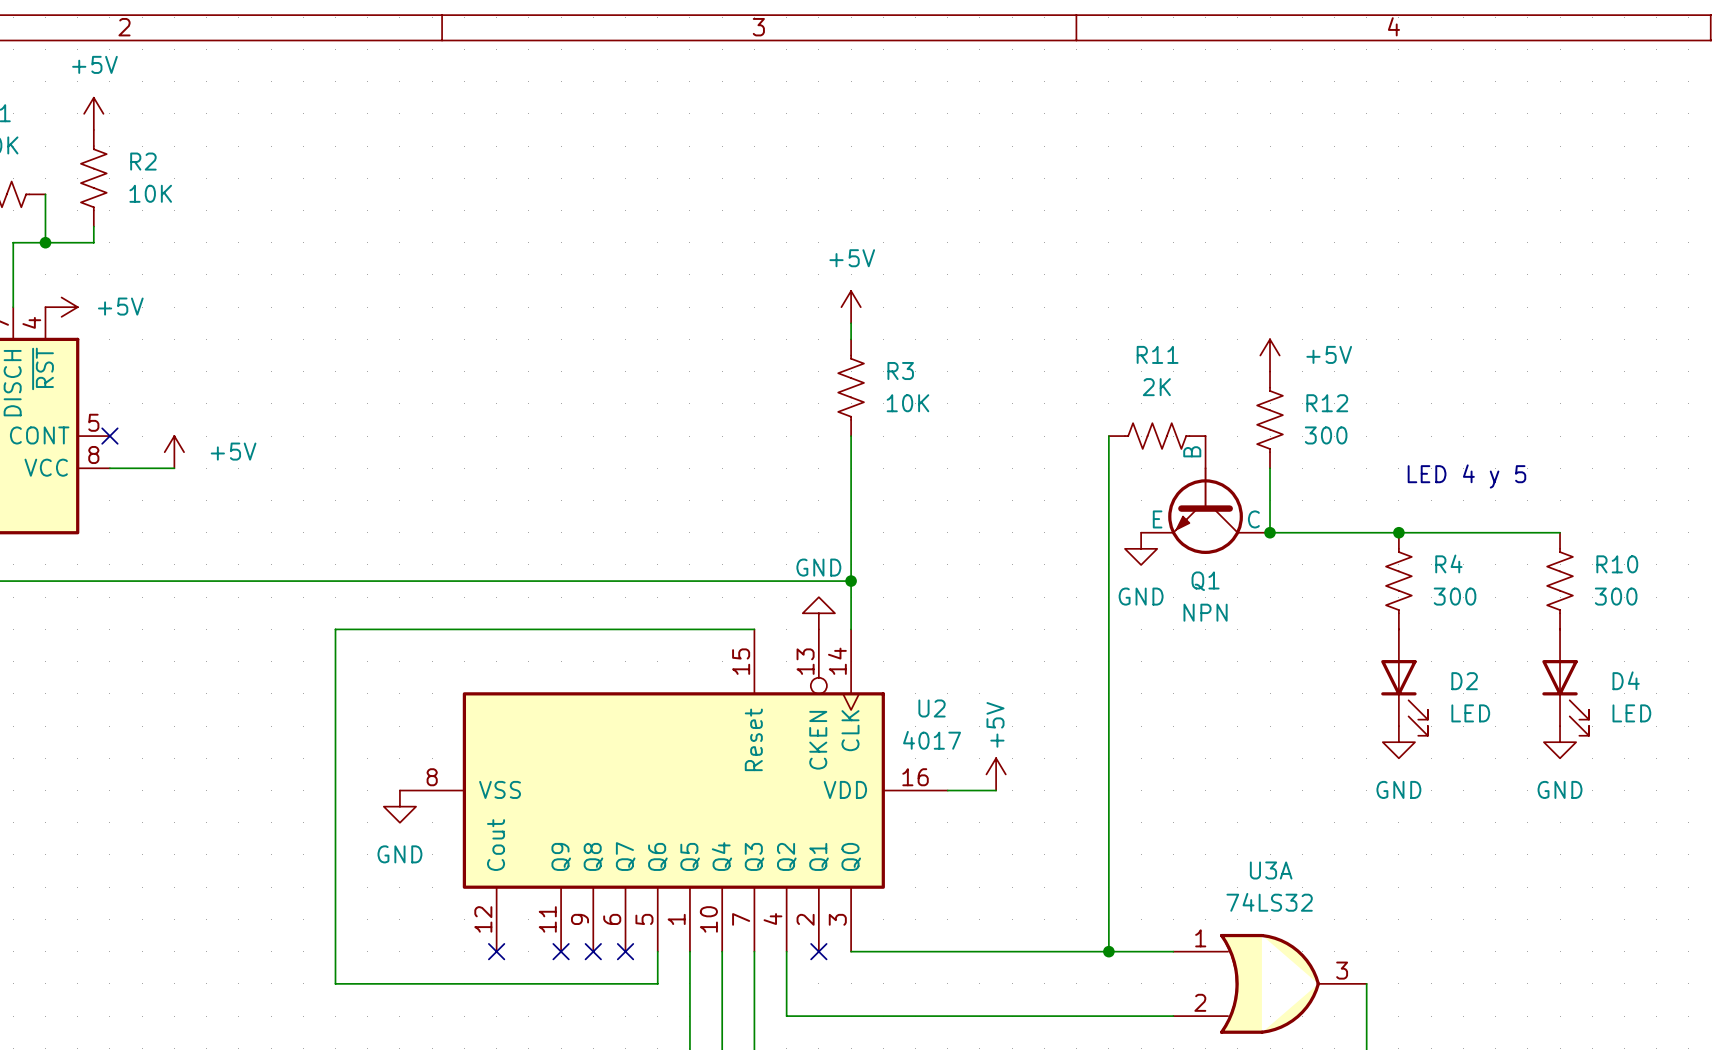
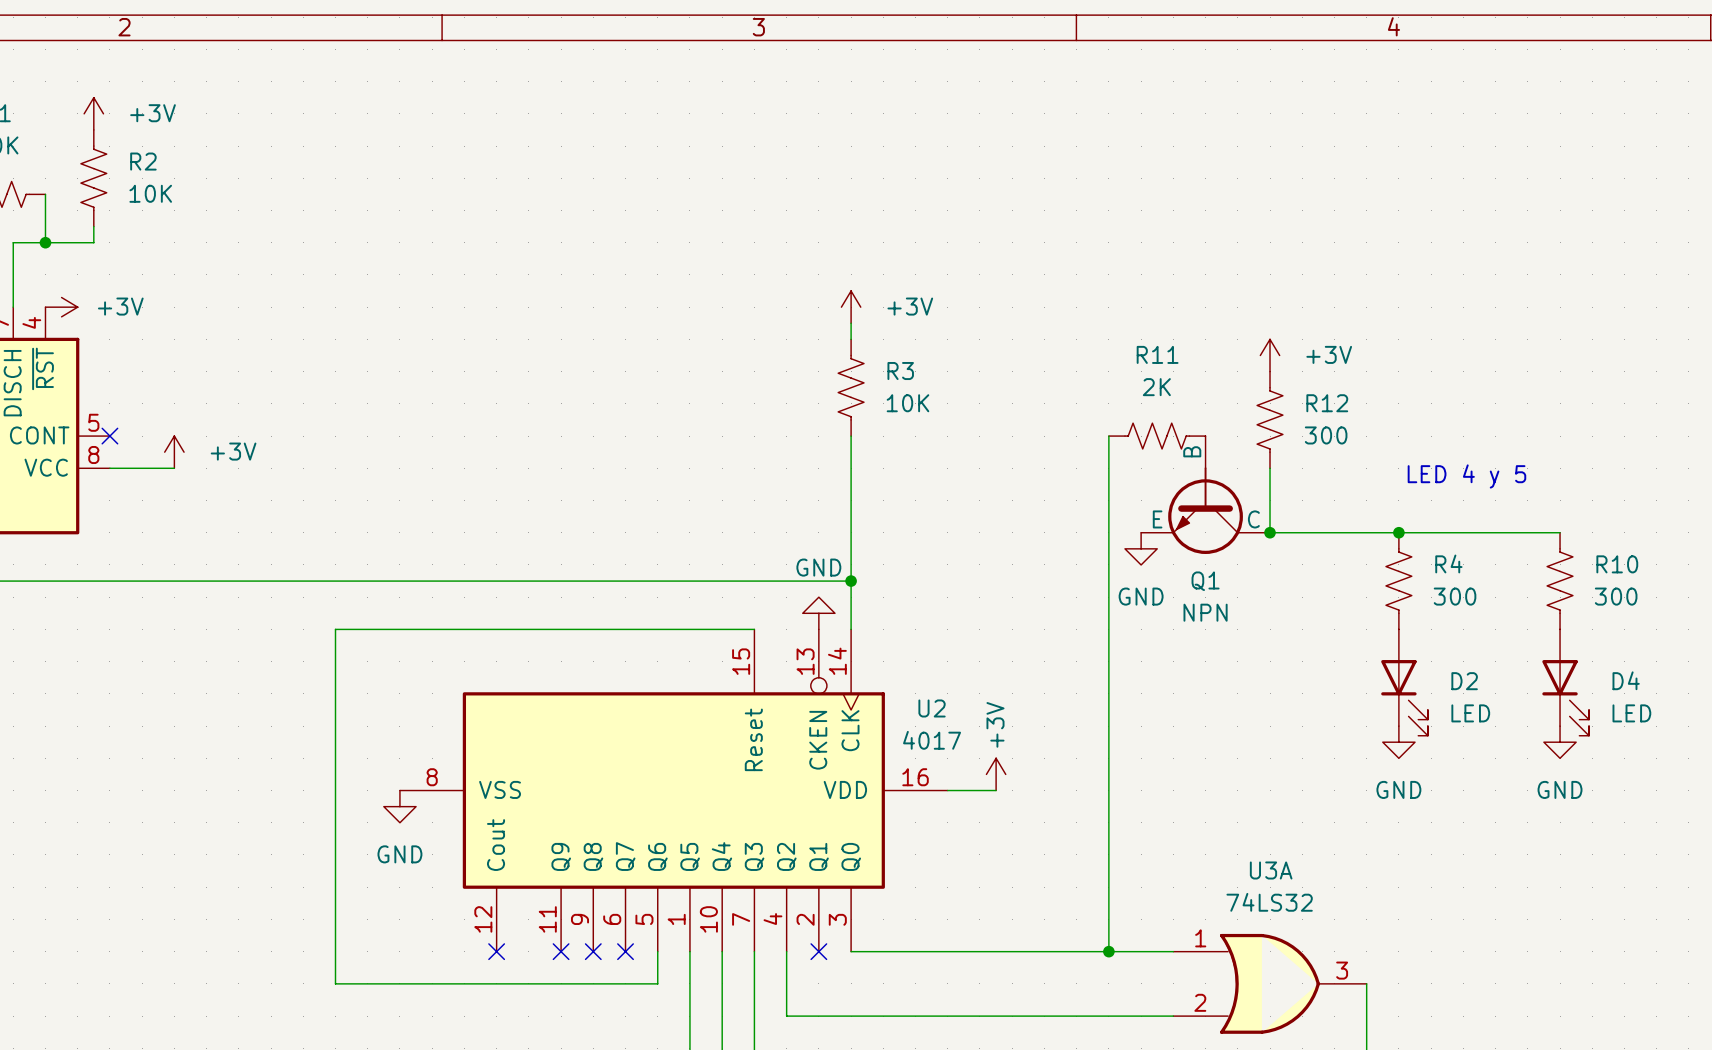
power symbol: +5V (93, 113) -> +3V (93, 113)
power symbol: +5V (61, 307) -> +3V (61, 307)
power symbol: +5V (851, 307) -> +3V (851, 307)
power symbol: +5V (1270, 355) -> +3V (1270, 355)
power symbol: +5V (174, 452) -> +3V (174, 452)
power symbol: +5V (996, 774) -> +3V (996, 774)

